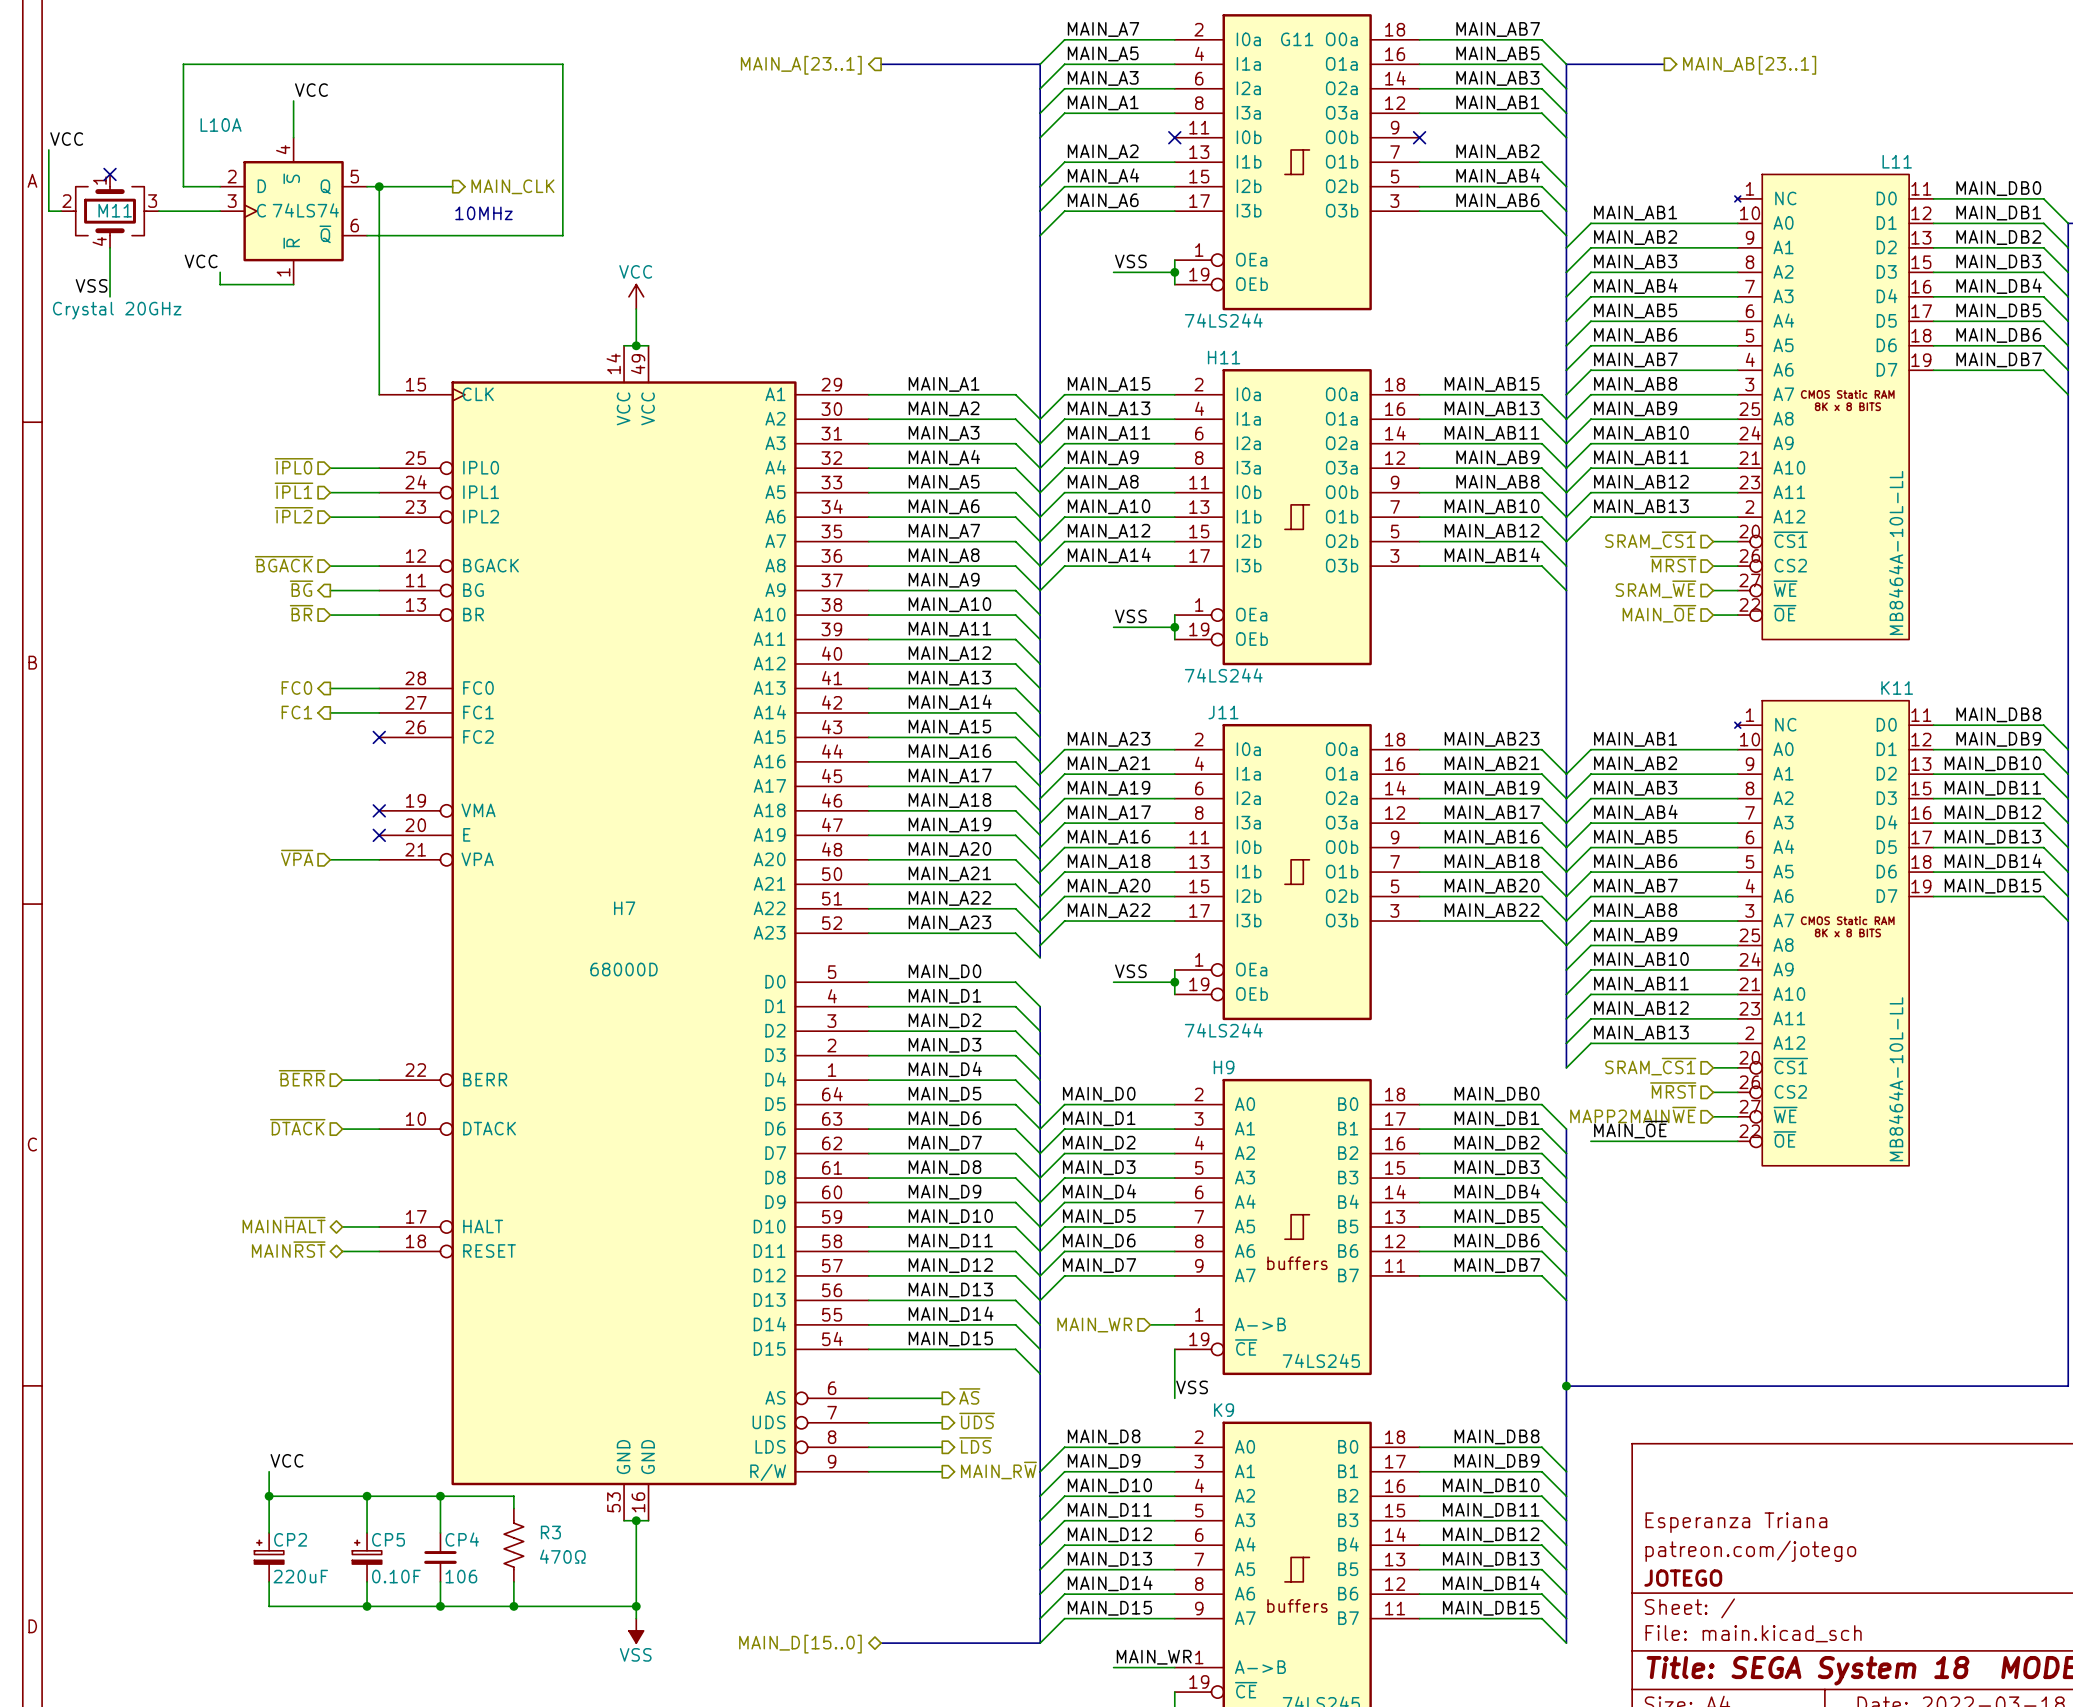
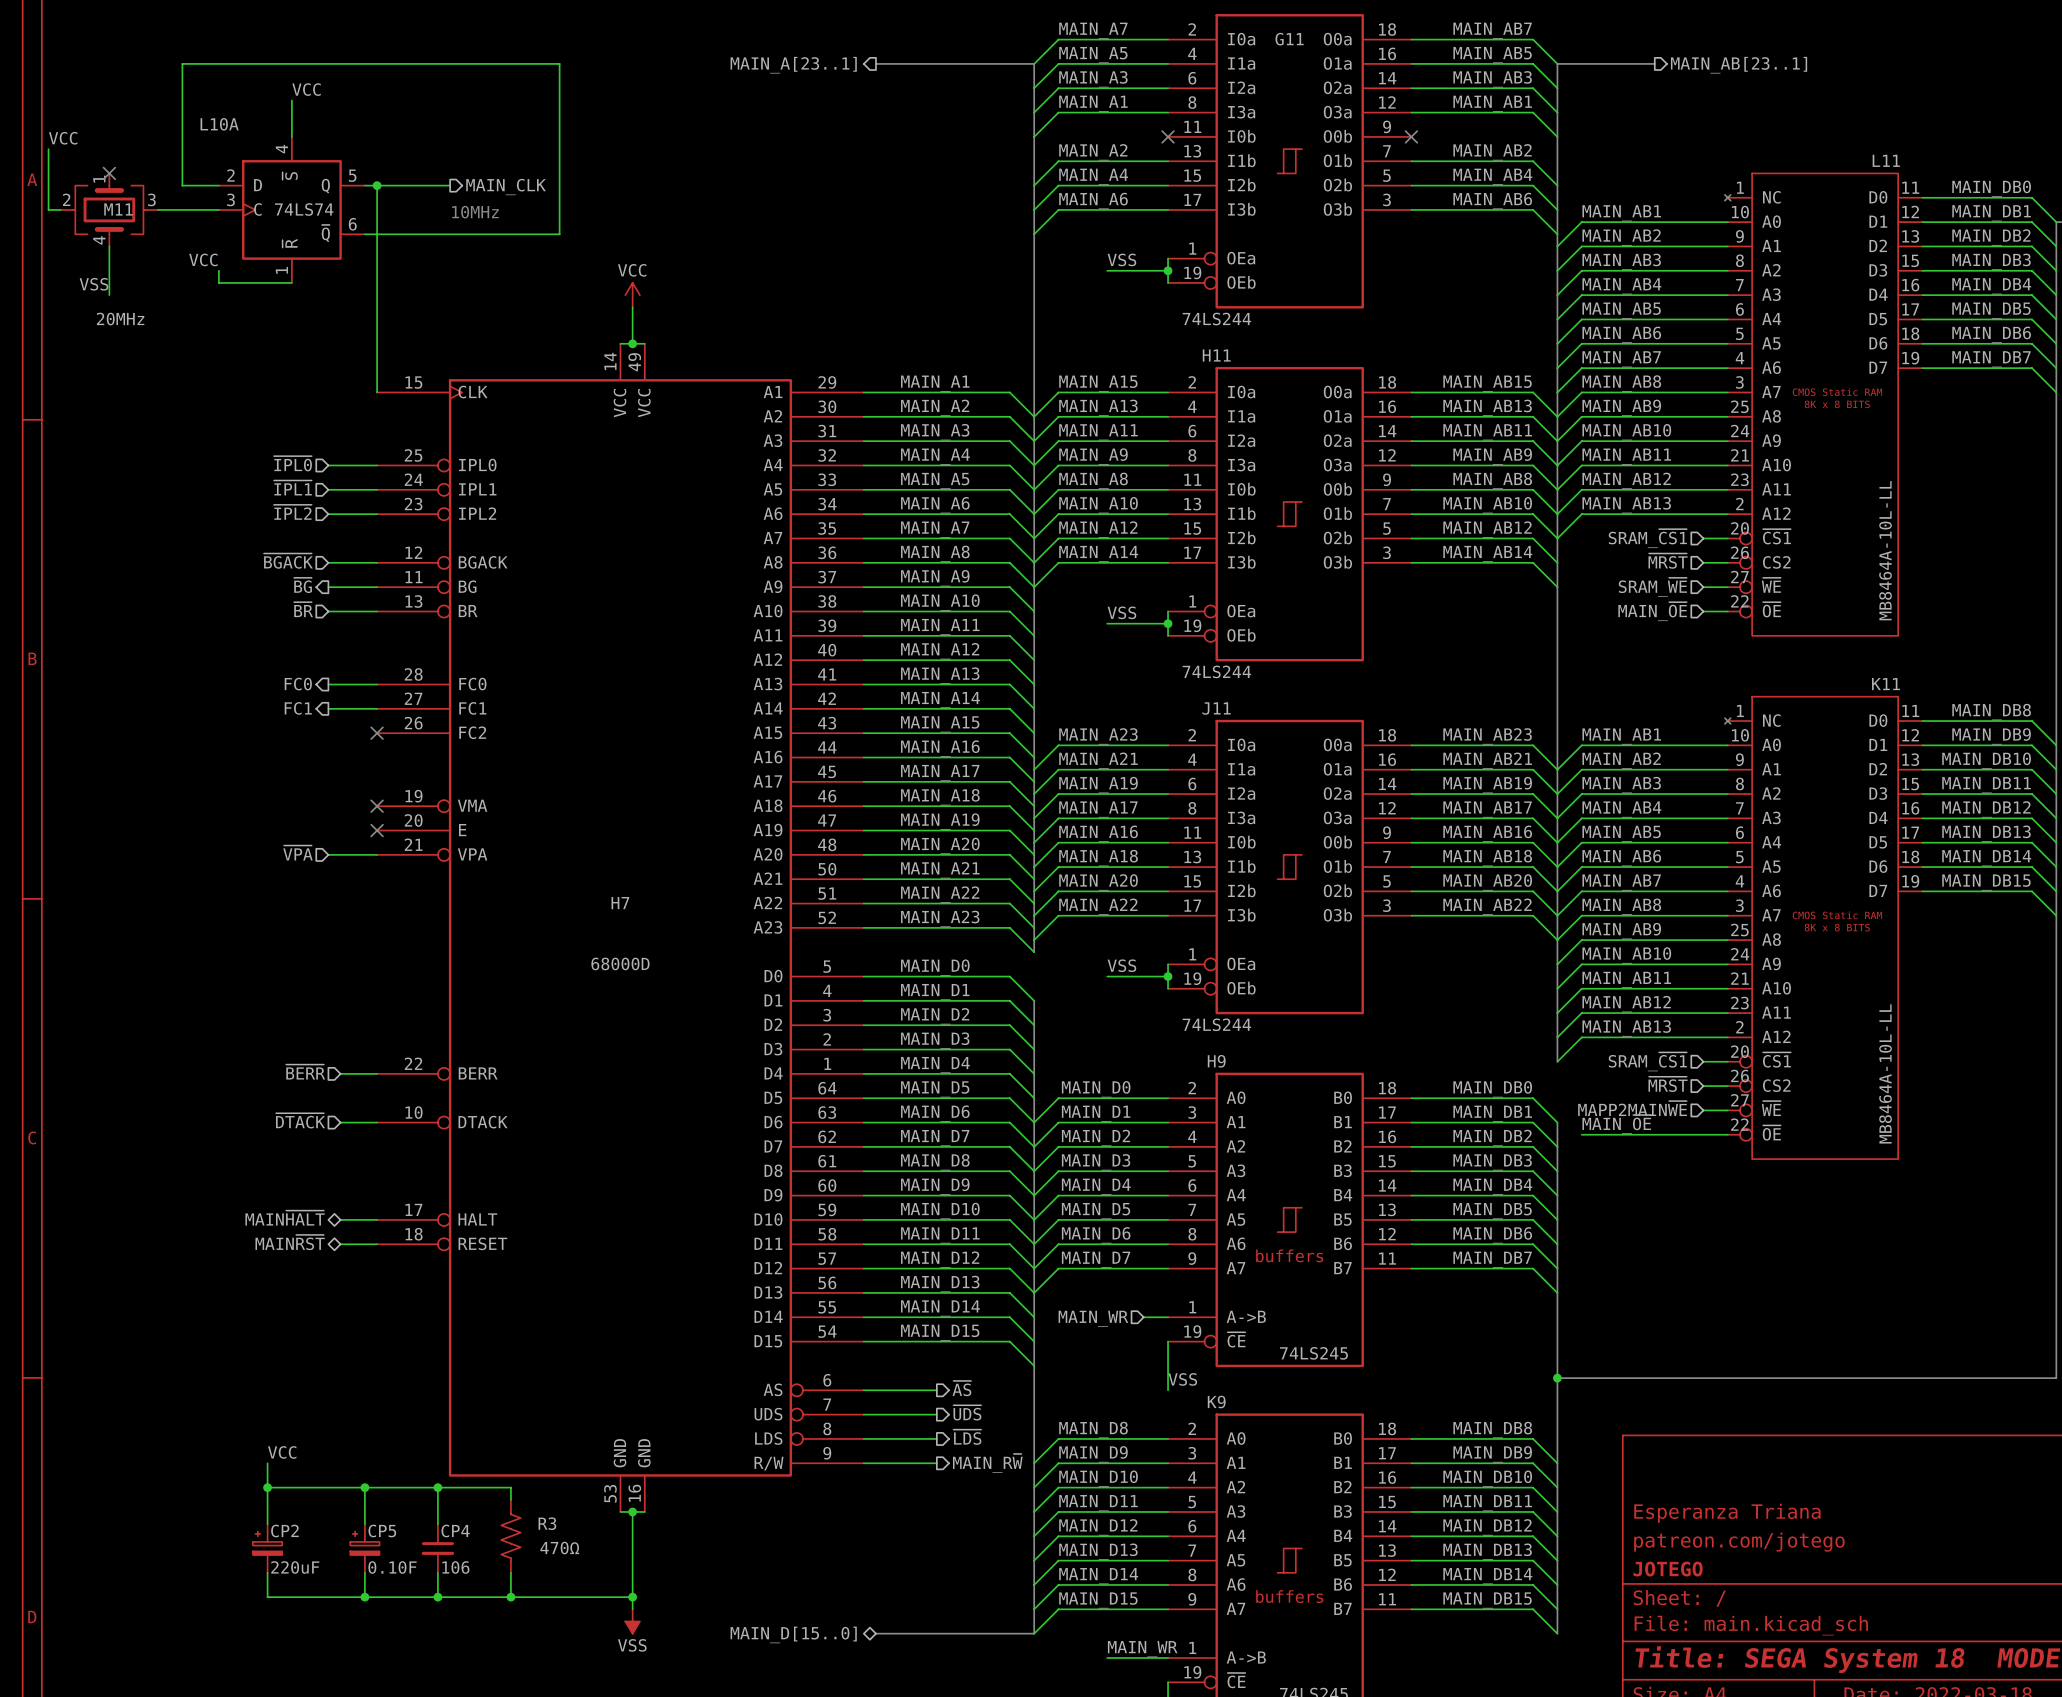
M11 value: Crystal 20GHz (117, 310) -> 20MHz (120, 319)

